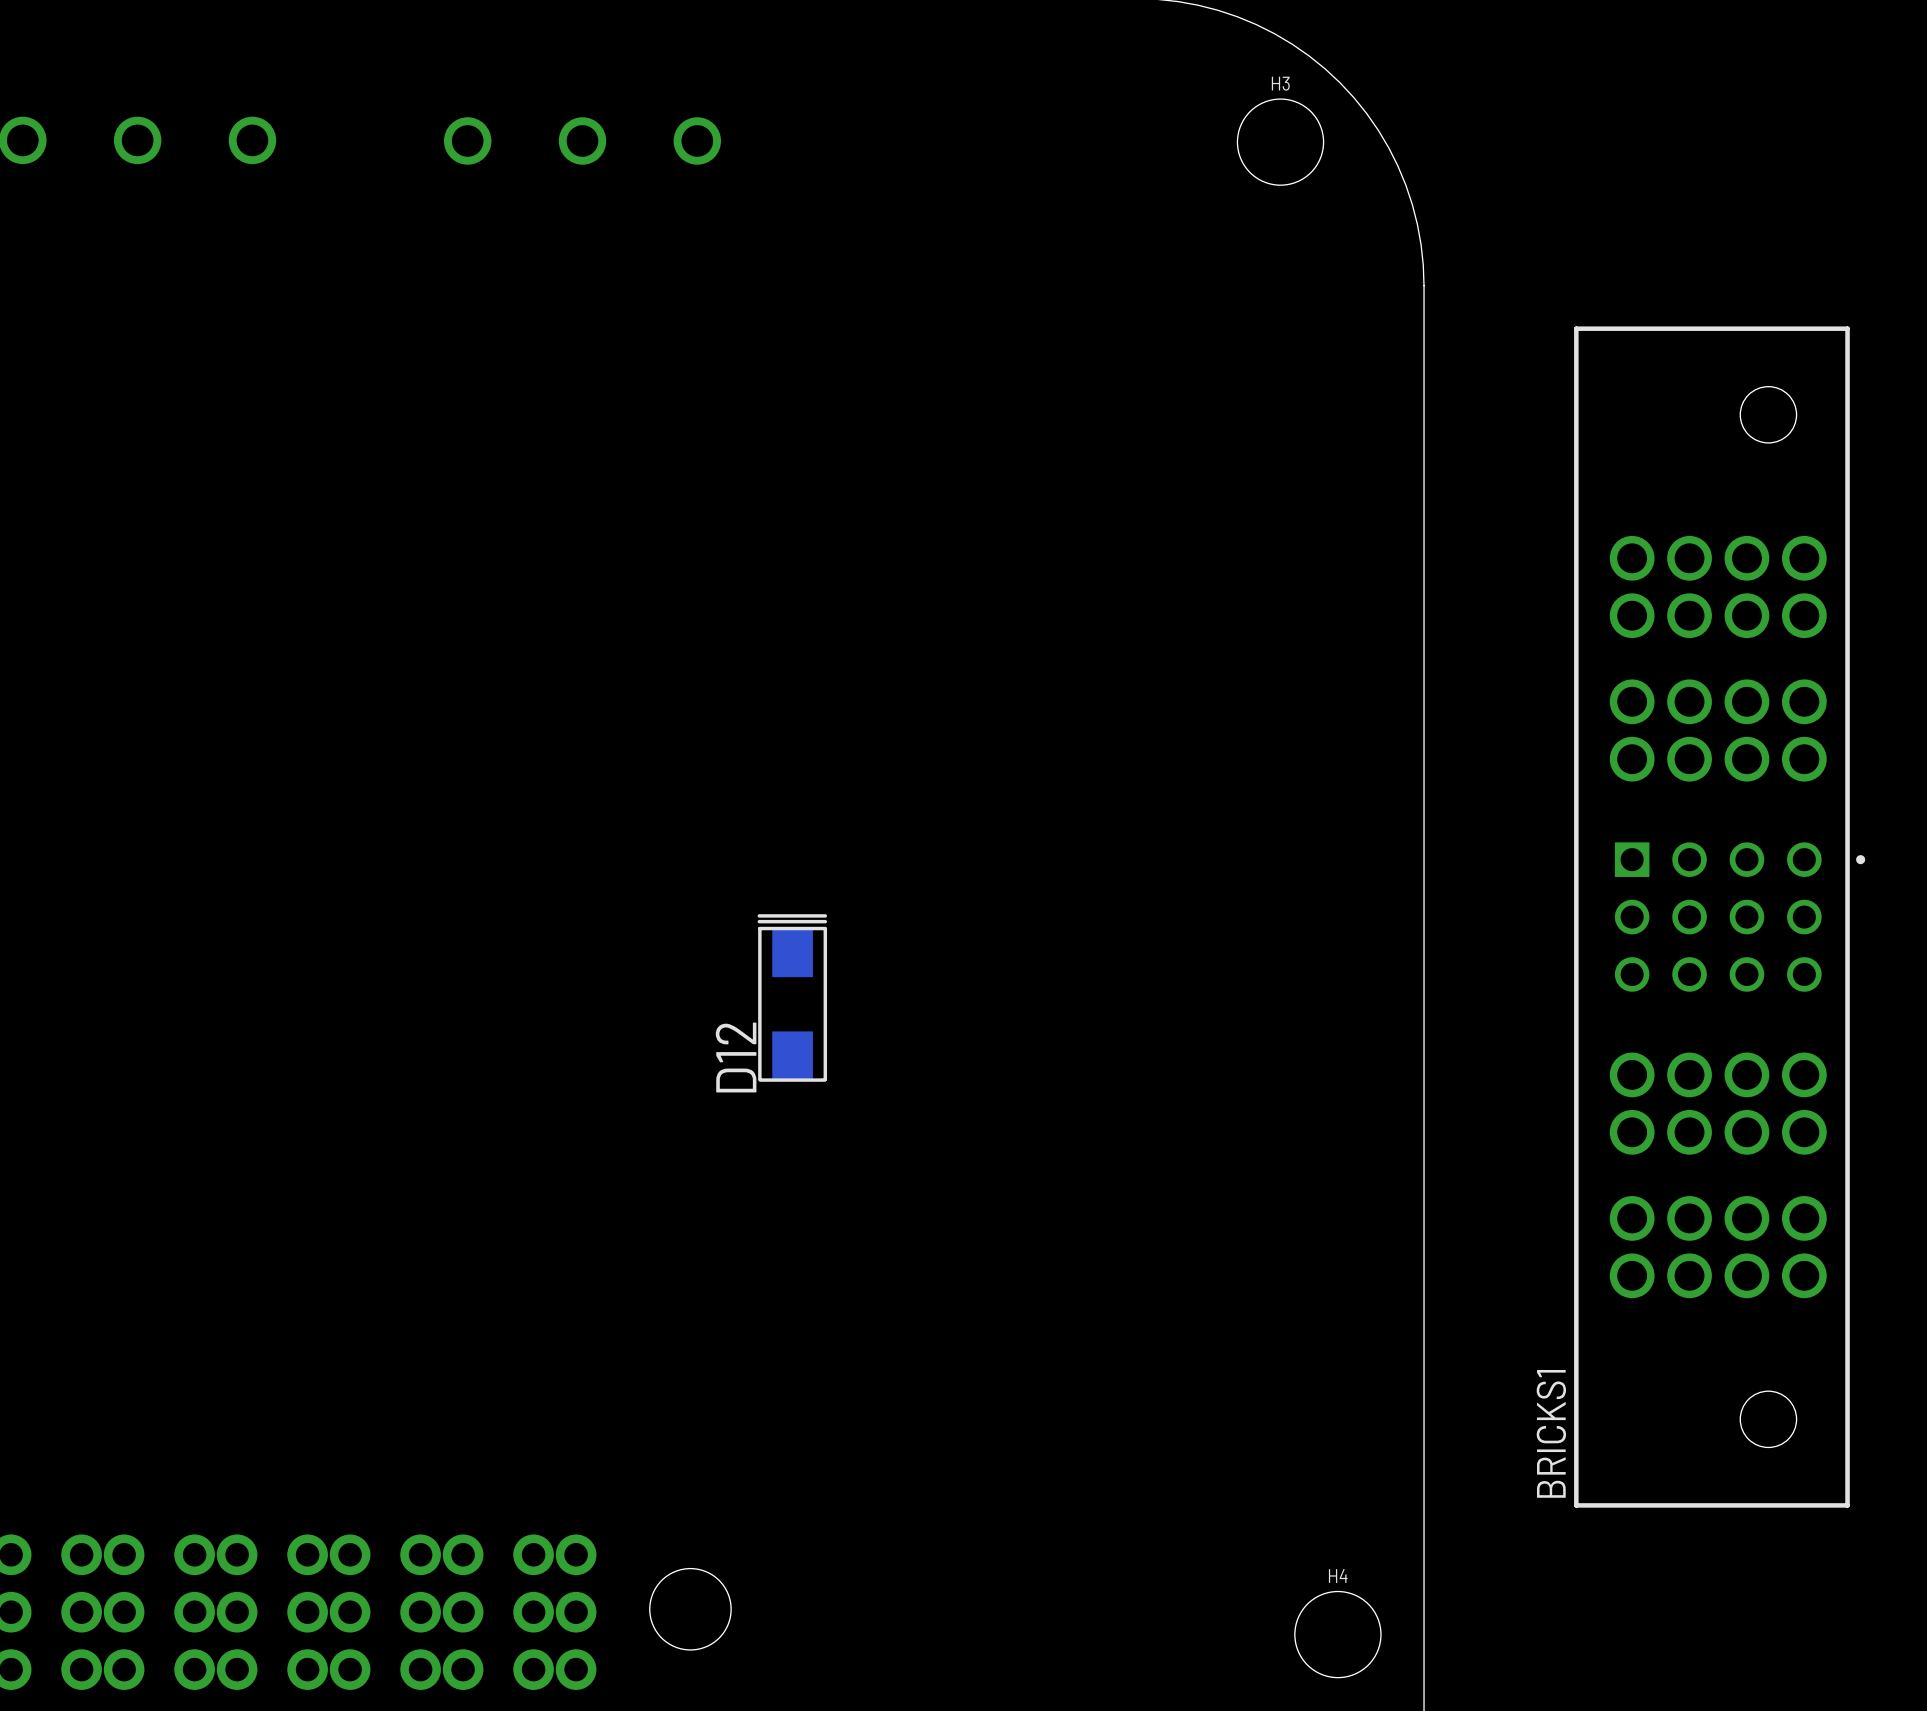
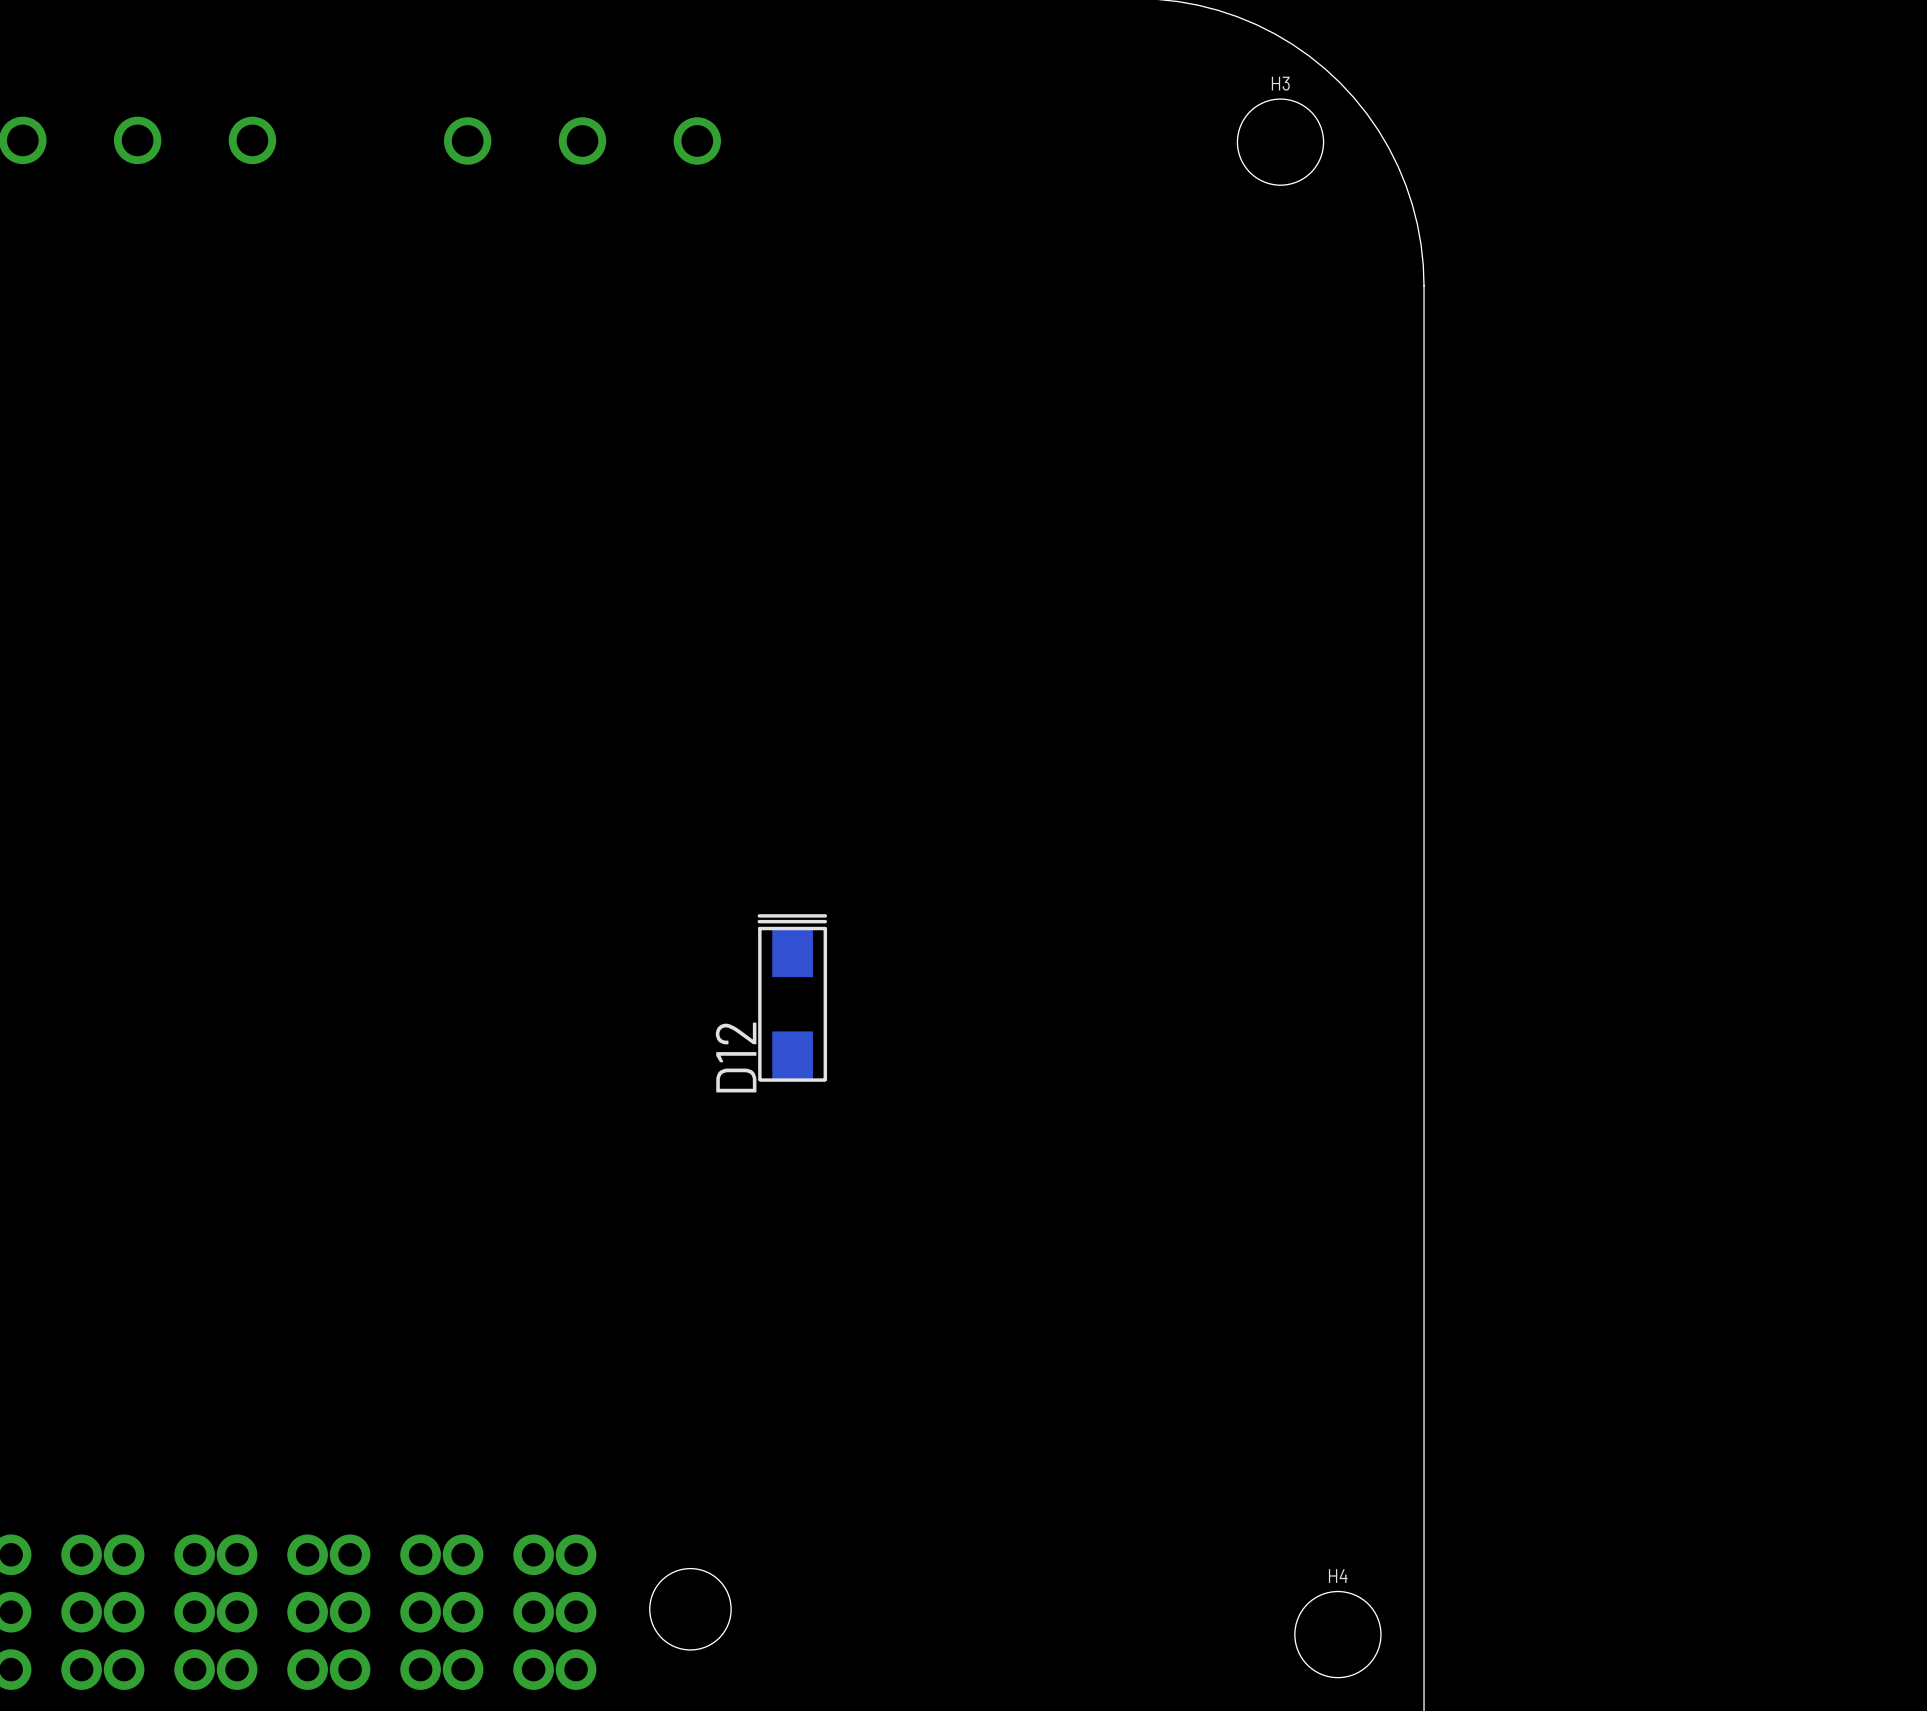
BRICKS1: (1719, 917) -> none

